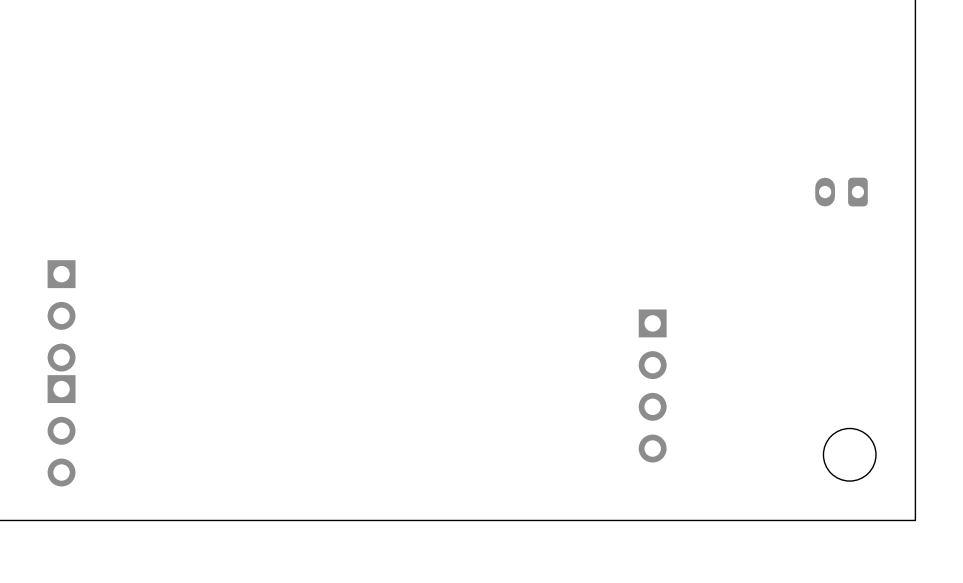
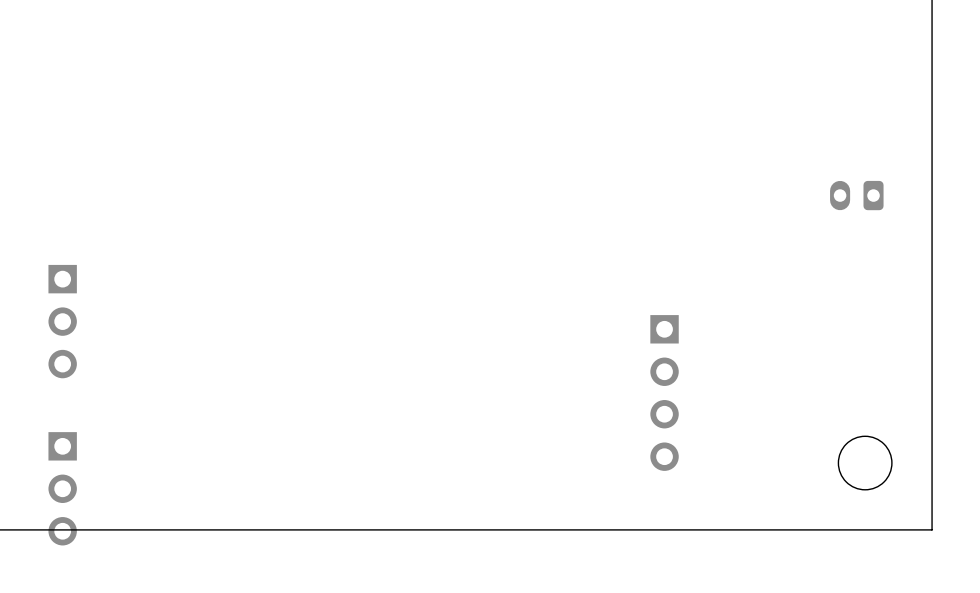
part position: (61, 430) -> (62, 488)

